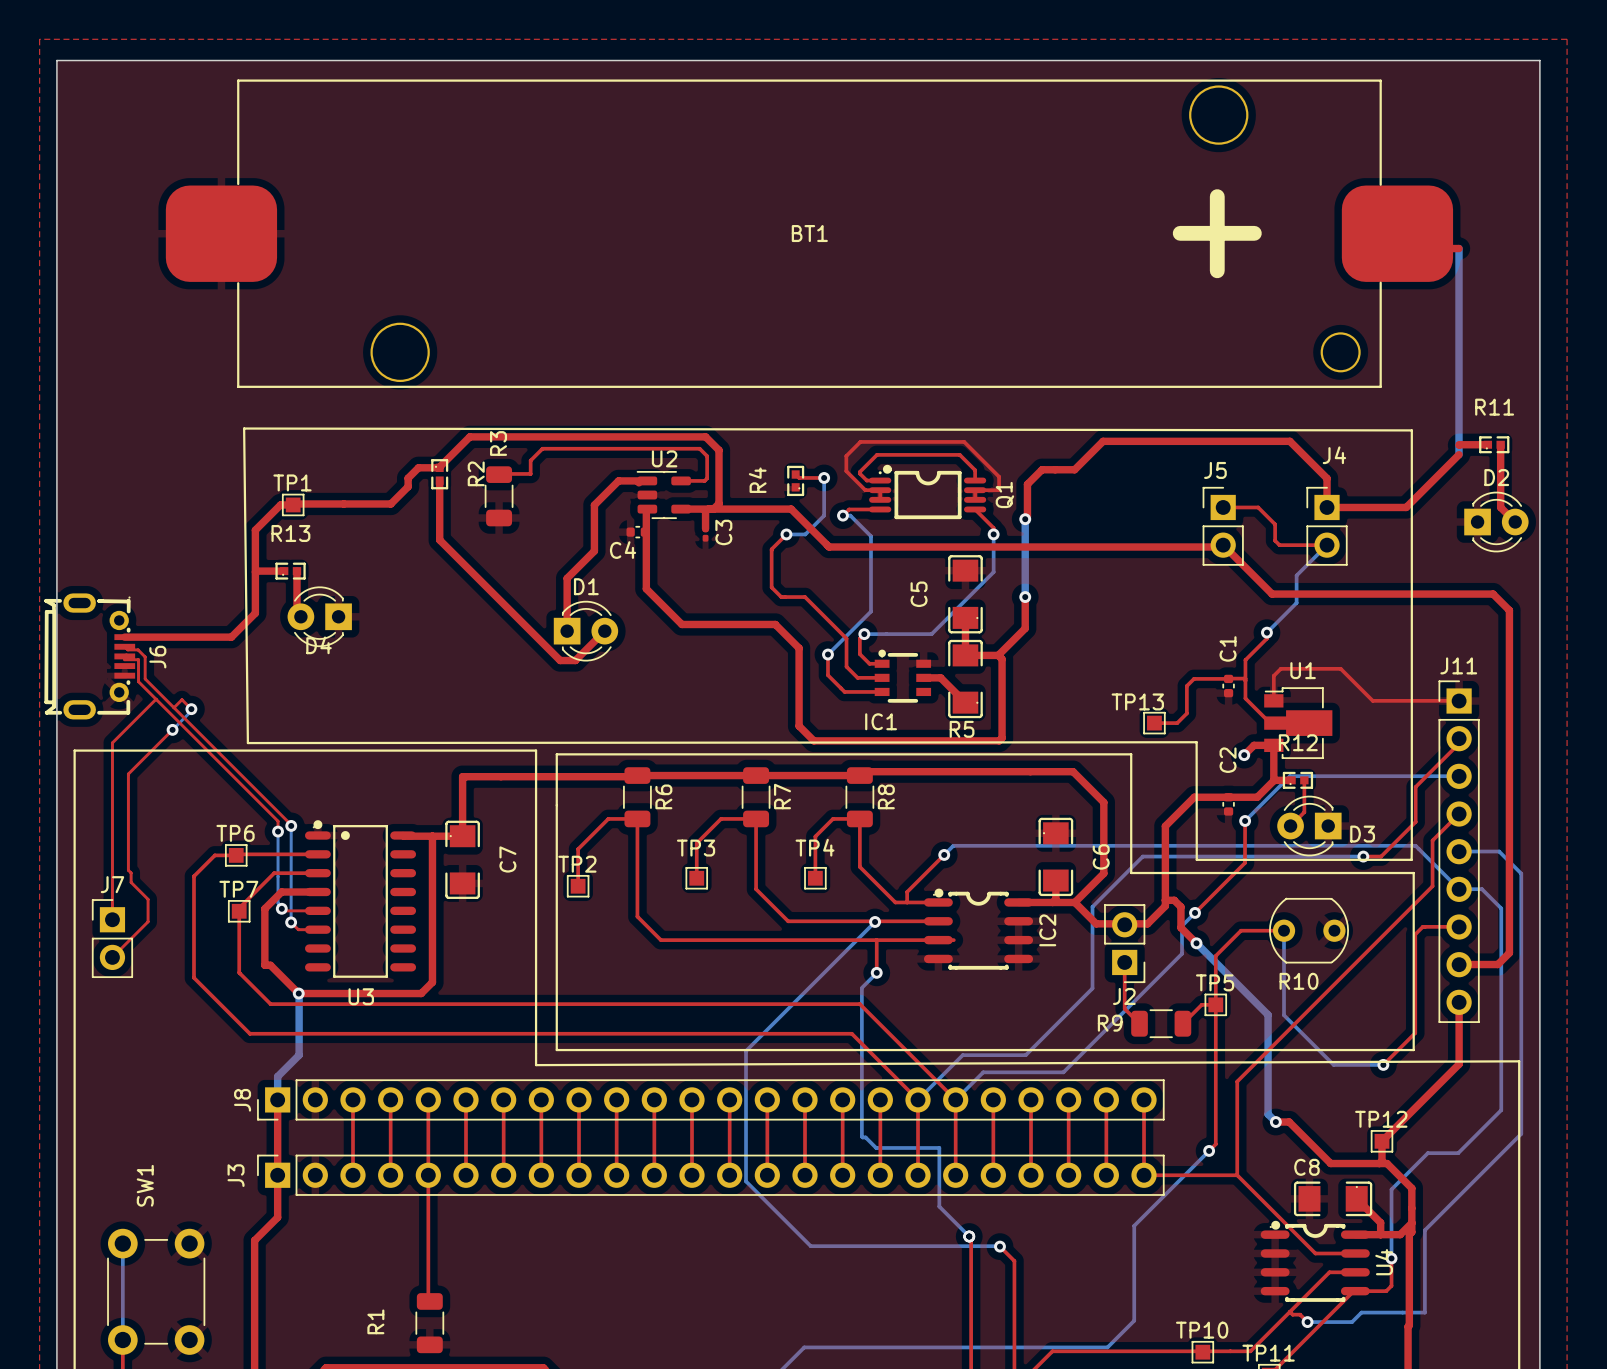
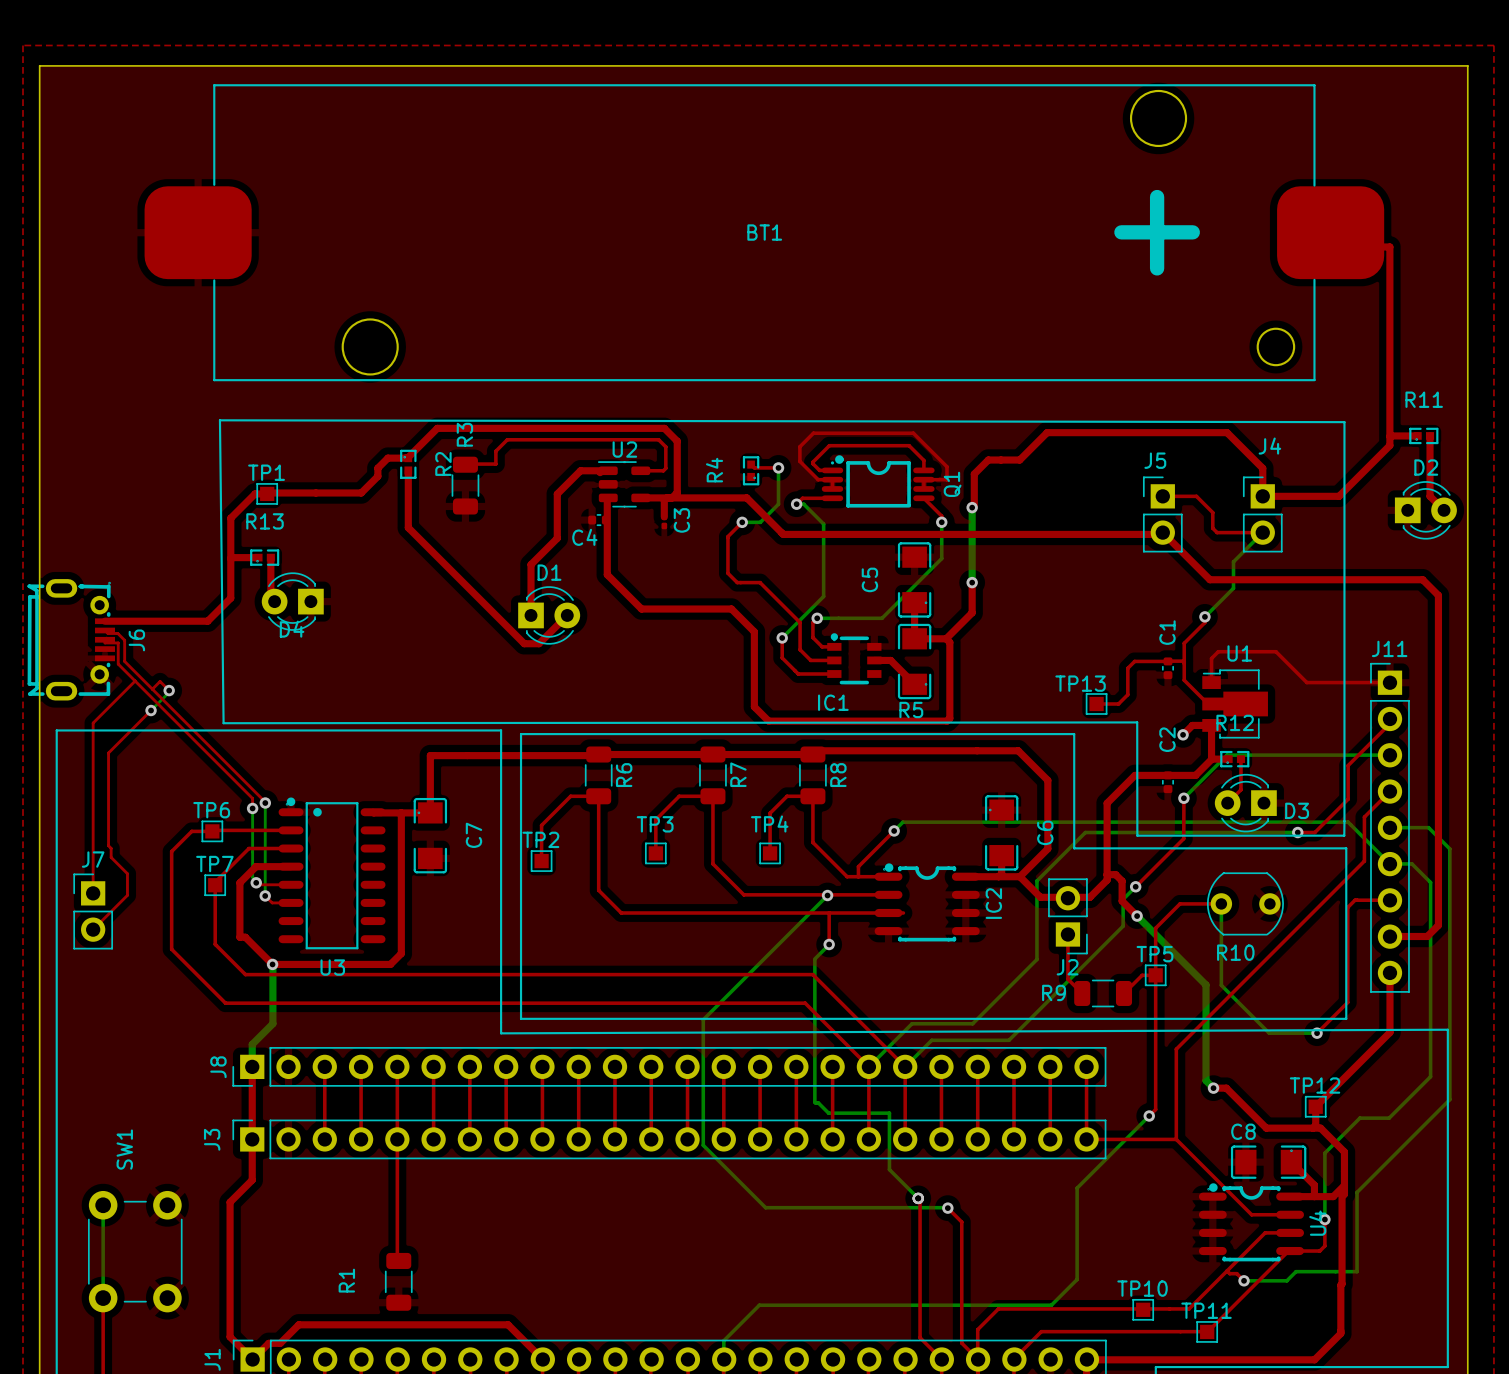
top track: none -> (1389, 246) (1389, 445)
bottom track: (1459, 248) (1459, 454) -> none

